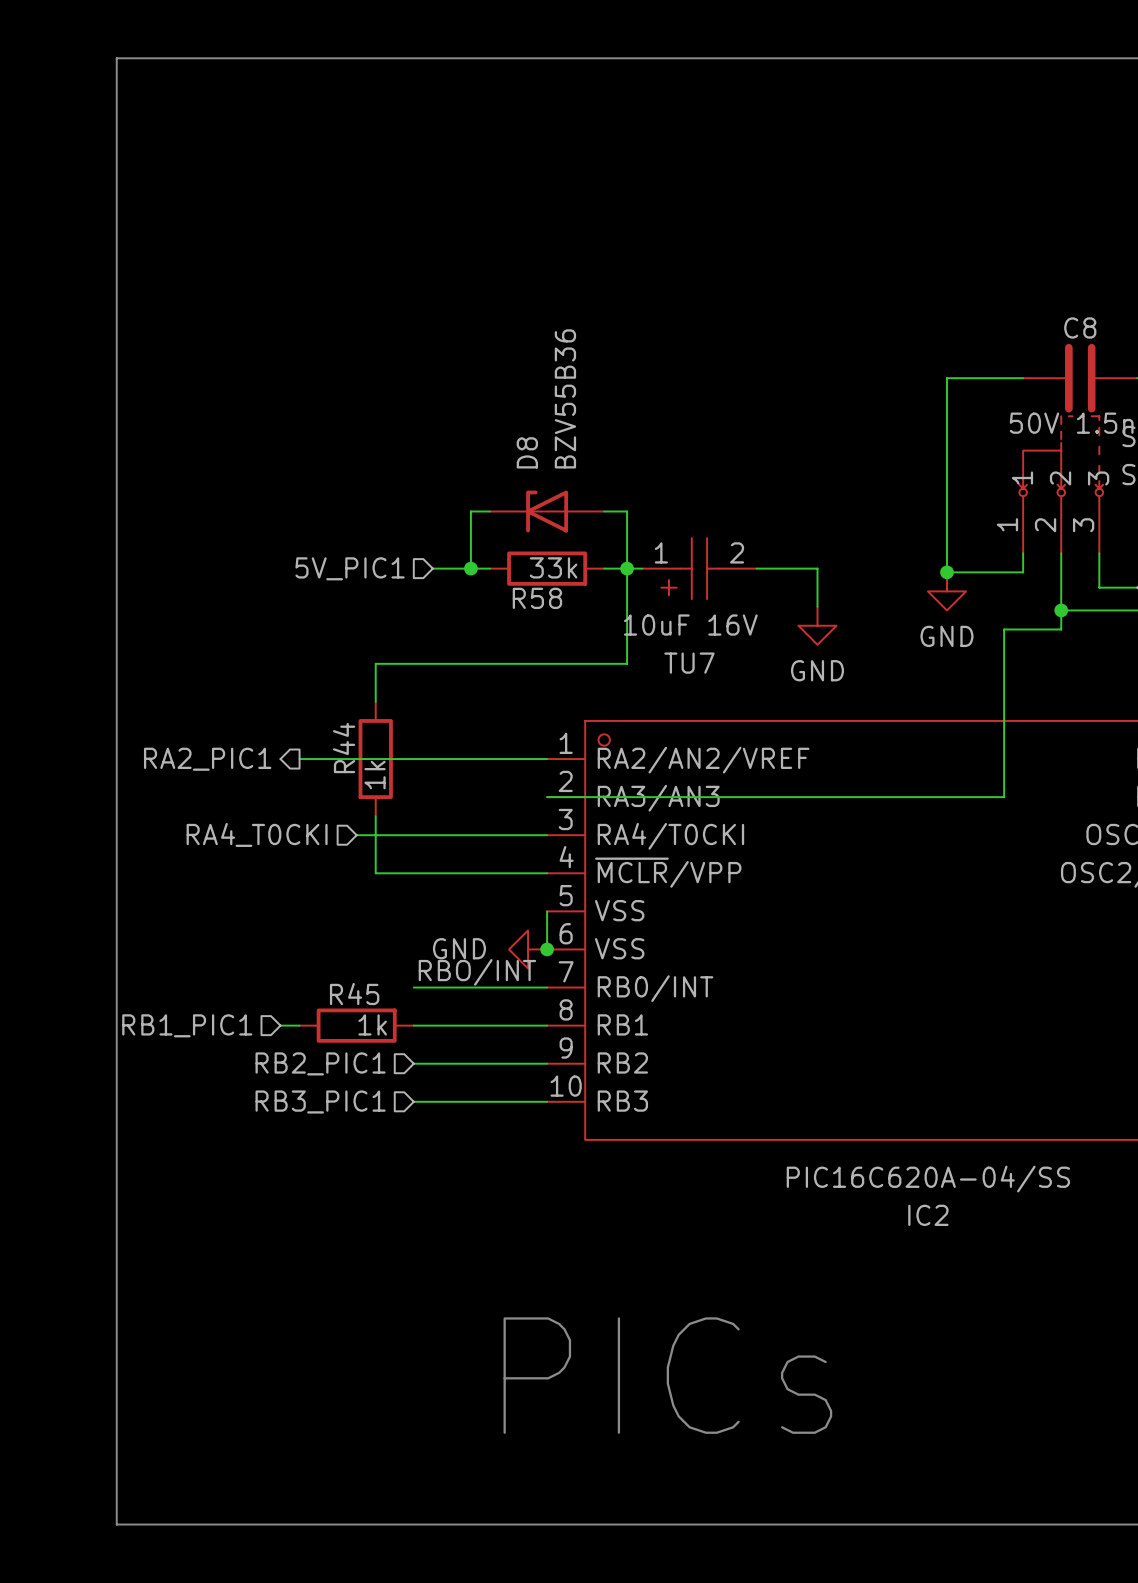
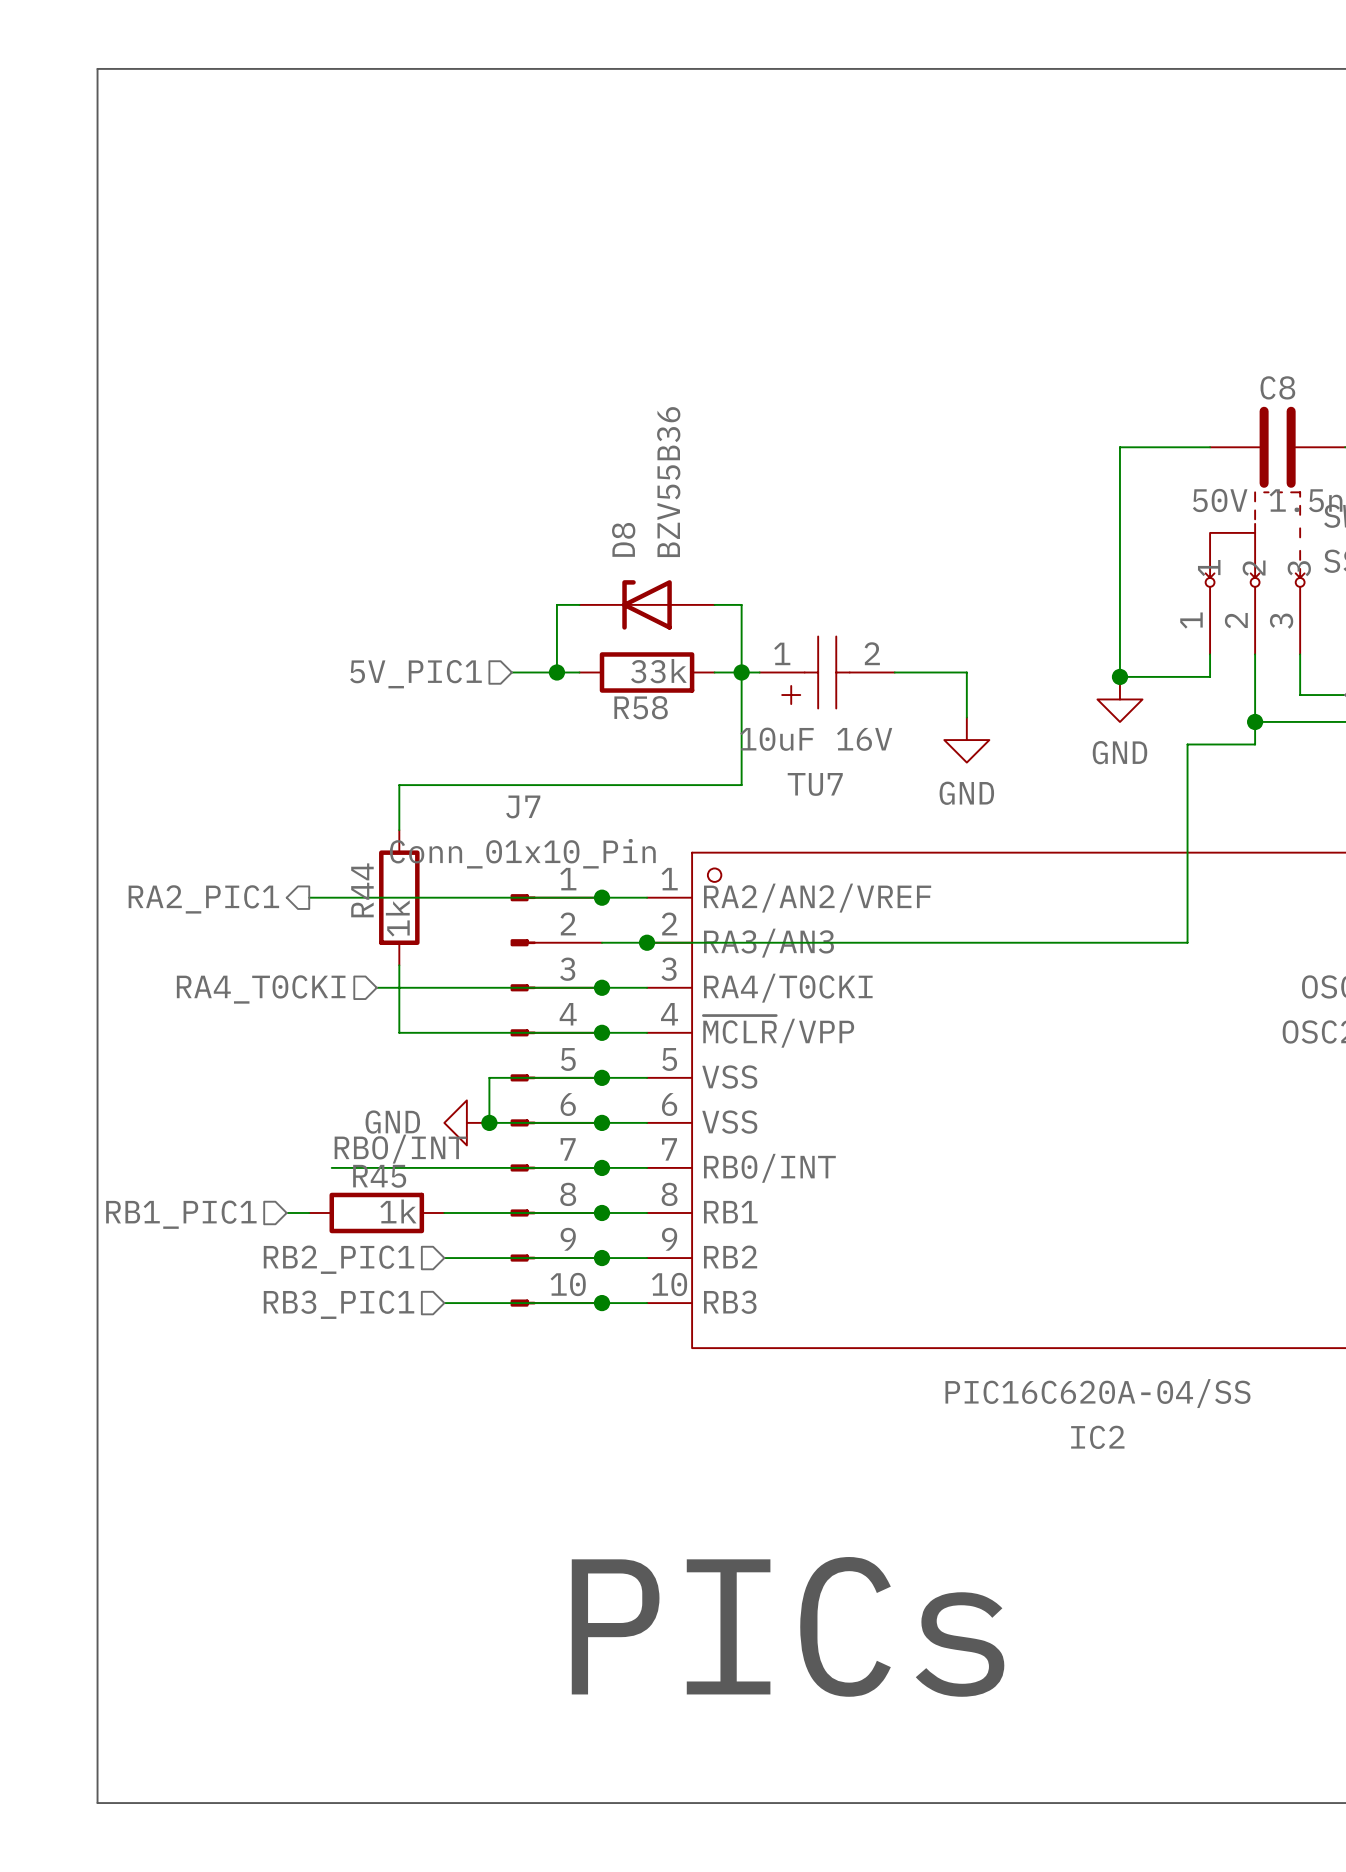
line: (116, 58) (116, 1524) -> (138, 68) (97, 68) (97, 1803) (138, 1803)
wire: (375, 663) (375, 701) -> (444, 785) (399, 785) (399, 830)
hierarchical label position: RA2_PIC1 (207, 759) -> RA2_PIC1 (203, 899)
wire: none -> (309, 897) (354, 897)
R44 position: (375, 759) -> (399, 897)
junction: none -> (602, 897)
wire: none -> (602, 942) (647, 942)
junction: none -> (647, 942)
wire: (375, 816) (375, 873) -> (399, 965) (399, 1032) (444, 1032)
hierarchical label position: RA4_T0CKI (257, 834) -> RA4_T0CKI (261, 989)
wire: none -> (376, 987) (421, 987)
junction: none -> (602, 987)
junction: none -> (602, 1032)
junction: none -> (602, 1077)
wire: (547, 911) (547, 949) -> (647, 1077) (489, 1077) (489, 1122) (647, 1122)
J7: none -> Conn_01x10_Pin (556, 1100)
junction: none -> (489, 1122)
junction: none -> (602, 1122)
power symbol position: GND (528, 949) -> GND (466, 1122)
junction: (547, 949) -> none
label position: RBO/INT (477, 972) -> RBO/INT (400, 1149)
wire: none -> (331, 1167) (489, 1167)
junction: none -> (602, 1167)
hierarchical label position: RB1_PIC1 (187, 1025) -> RB1_PIC1 (181, 1214)
wire: (280, 1025) (299, 1025) -> (286, 1212) (309, 1212)
R45 position: (356, 1025) -> (376, 1212)
junction: none -> (602, 1212)
hierarchical label position: RB2_PIC1 (320, 1063) -> RB2_PIC1 (339, 1259)
wire: none -> (444, 1258) (489, 1258)
junction: none -> (602, 1258)
hierarchical label position: RB3_PIC1 (320, 1101) -> RB3_PIC1 (339, 1304)
wire: none -> (444, 1303) (489, 1303)
junction: none -> (602, 1303)

